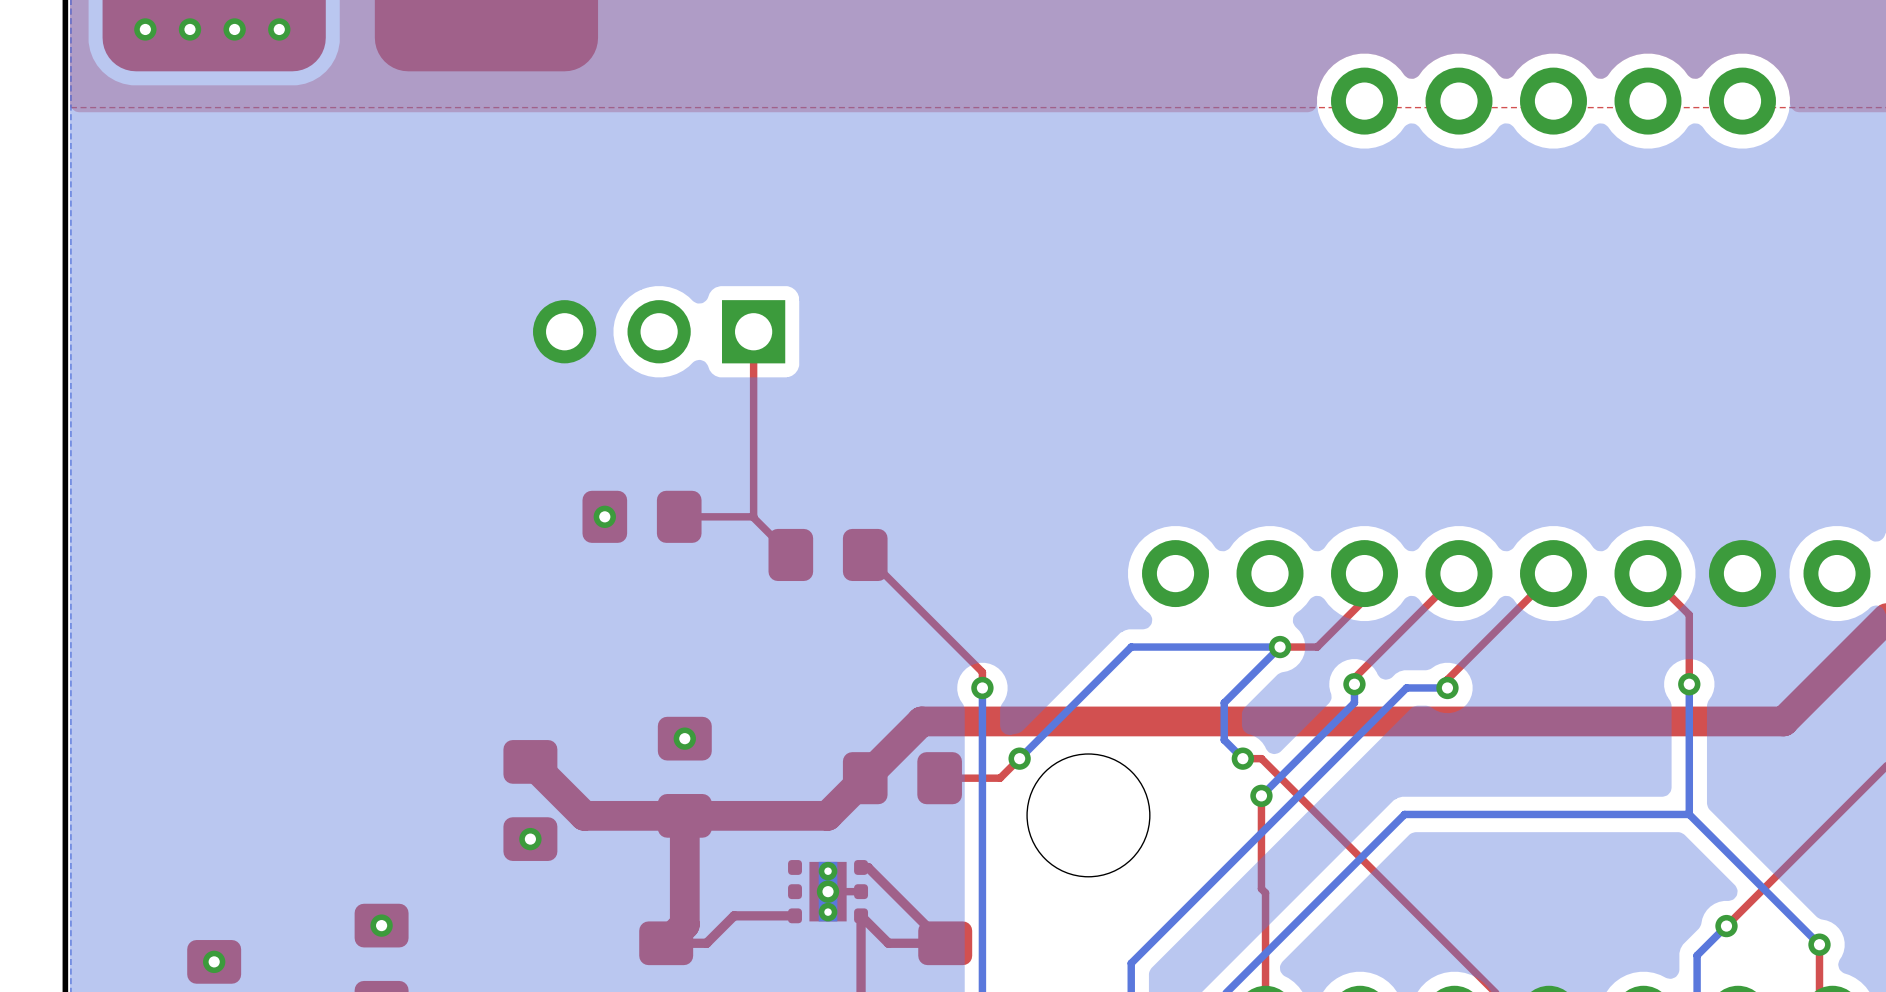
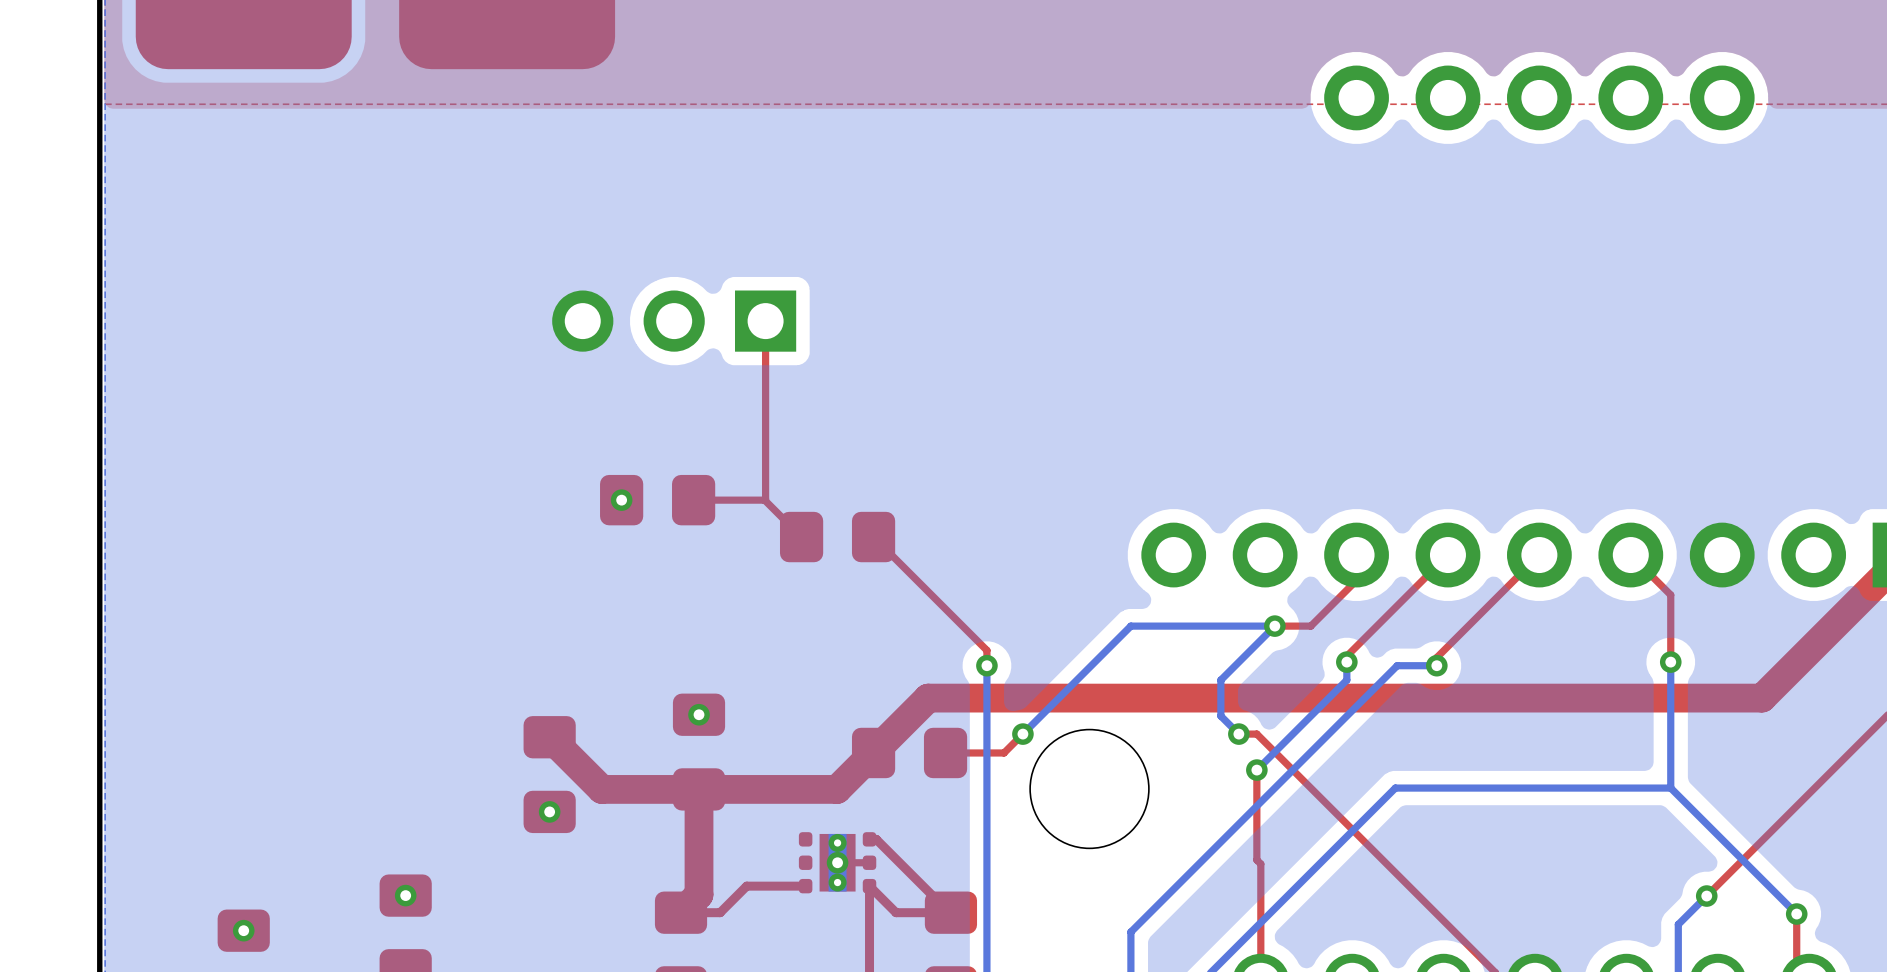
via: (145, 29) -> none
via: (189, 29) -> none
via: (234, 29) -> none
via: (279, 29) -> none

